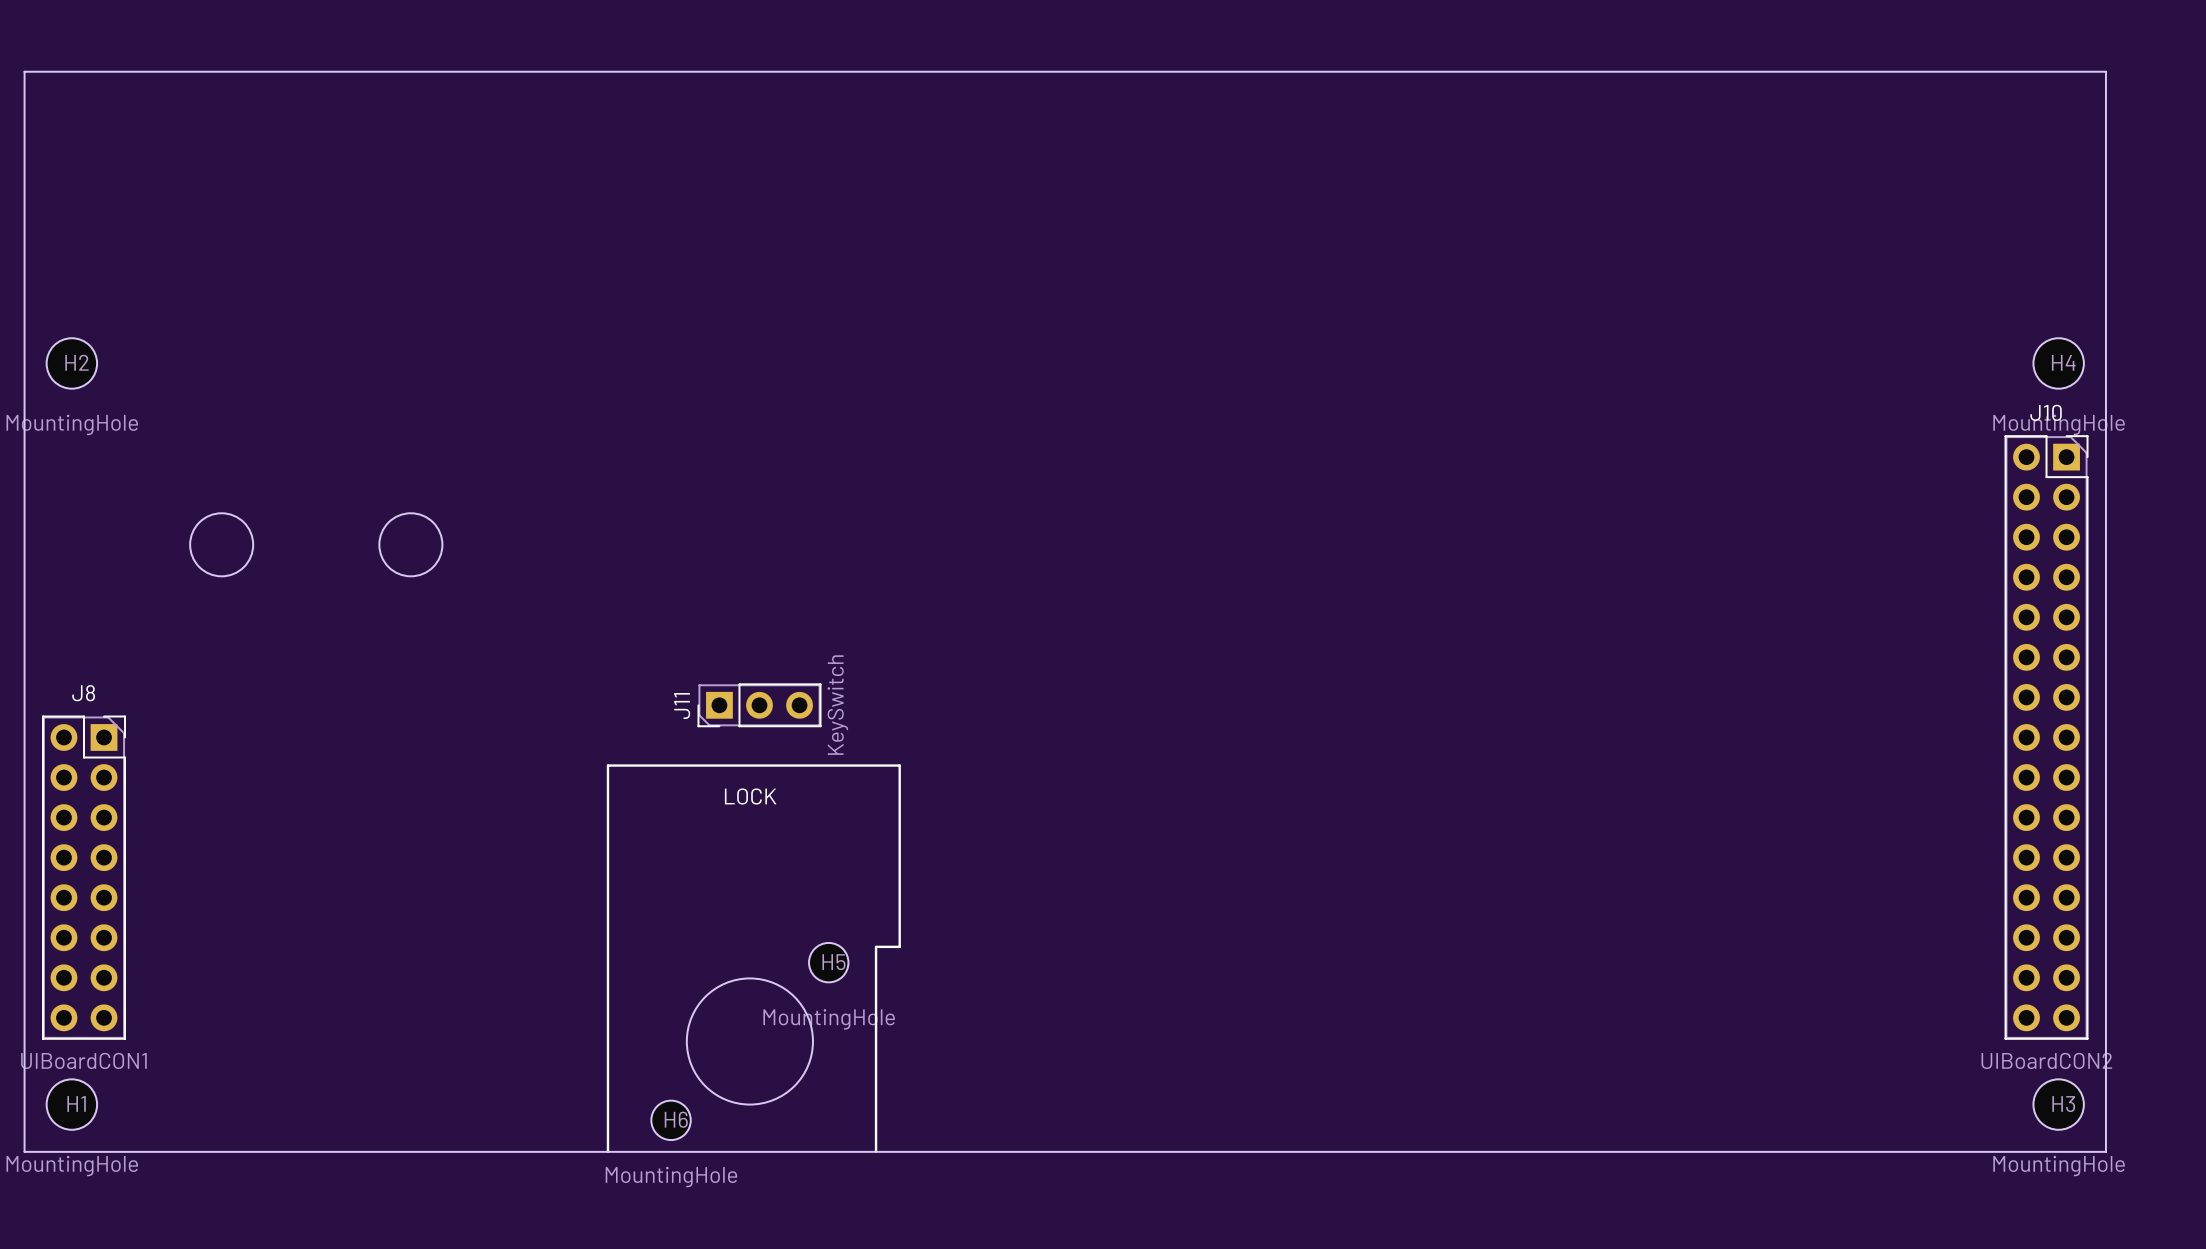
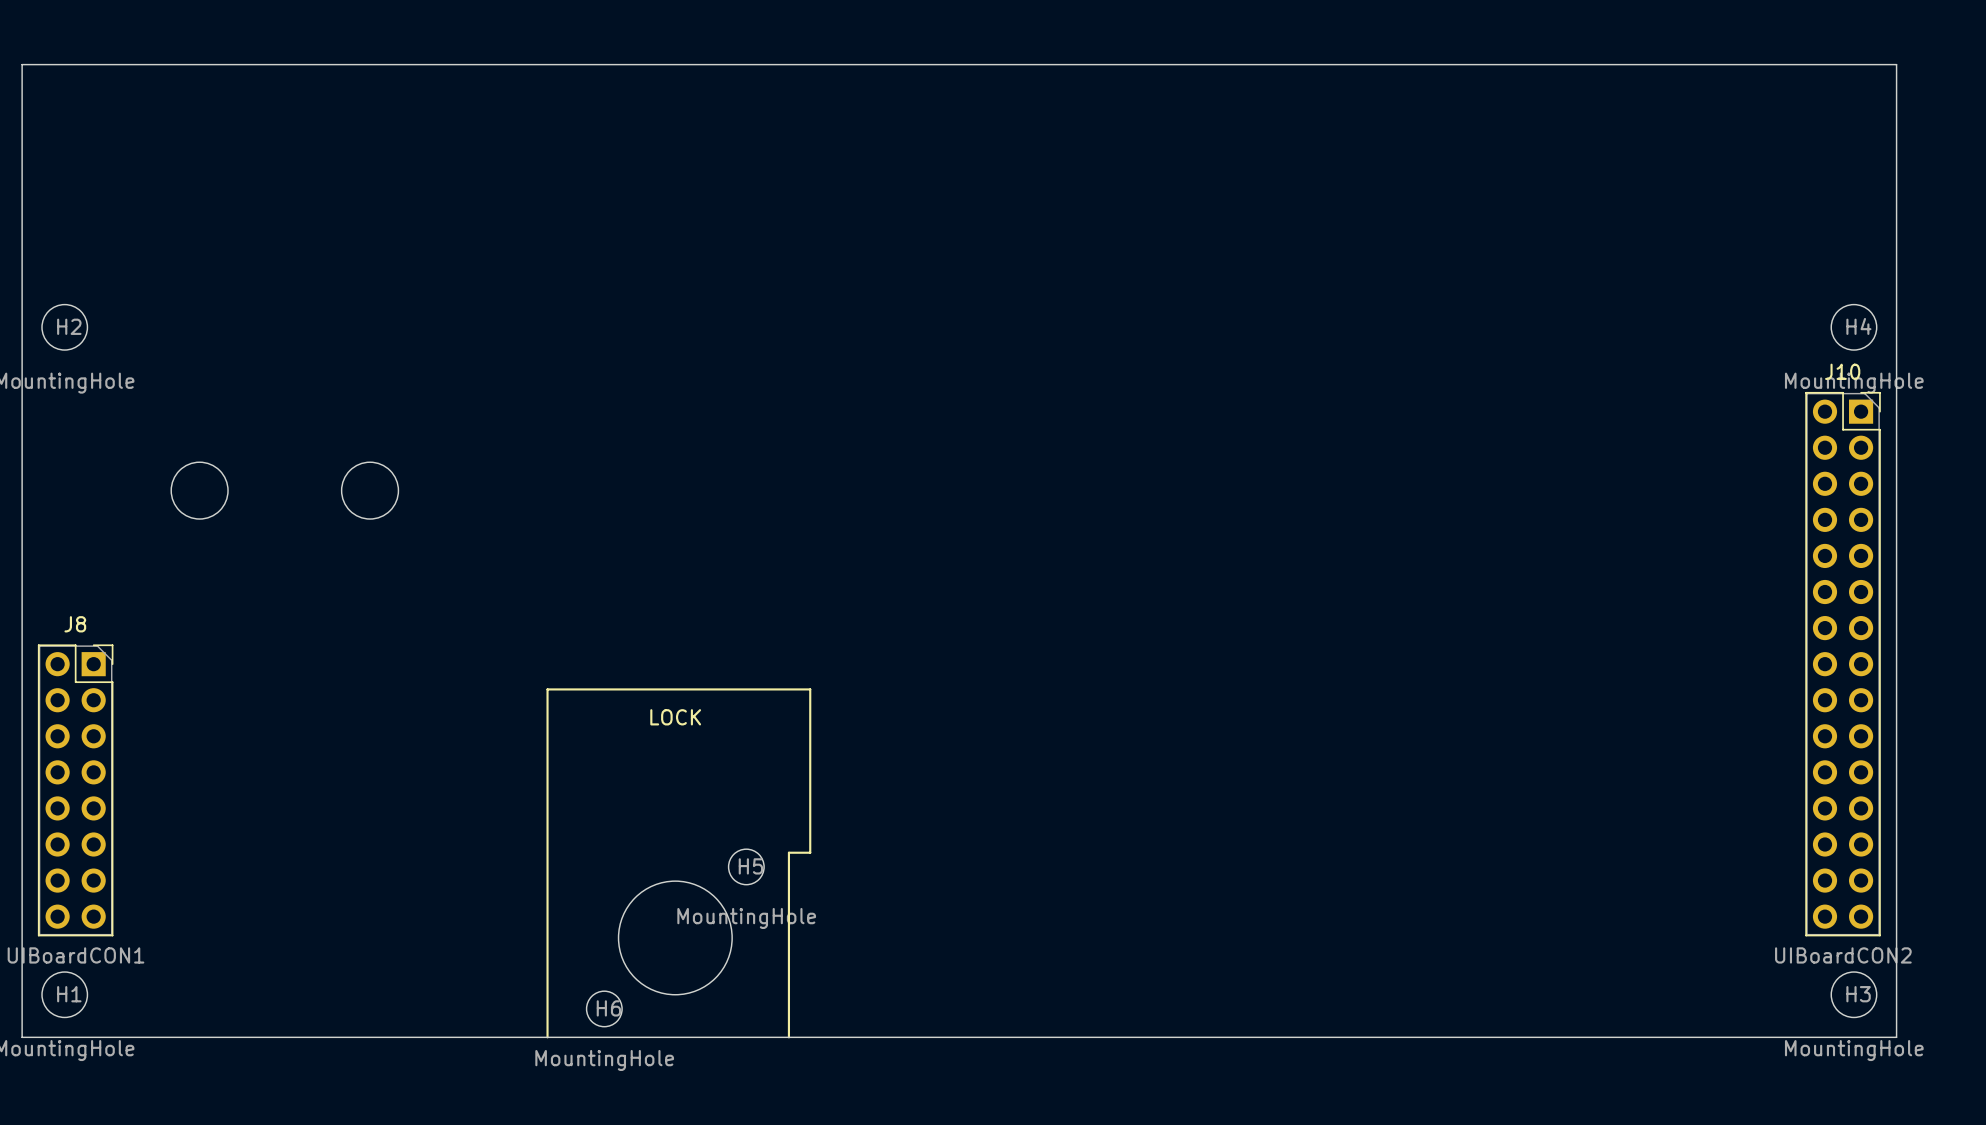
J11: KeySwitch (759, 705) -> none

